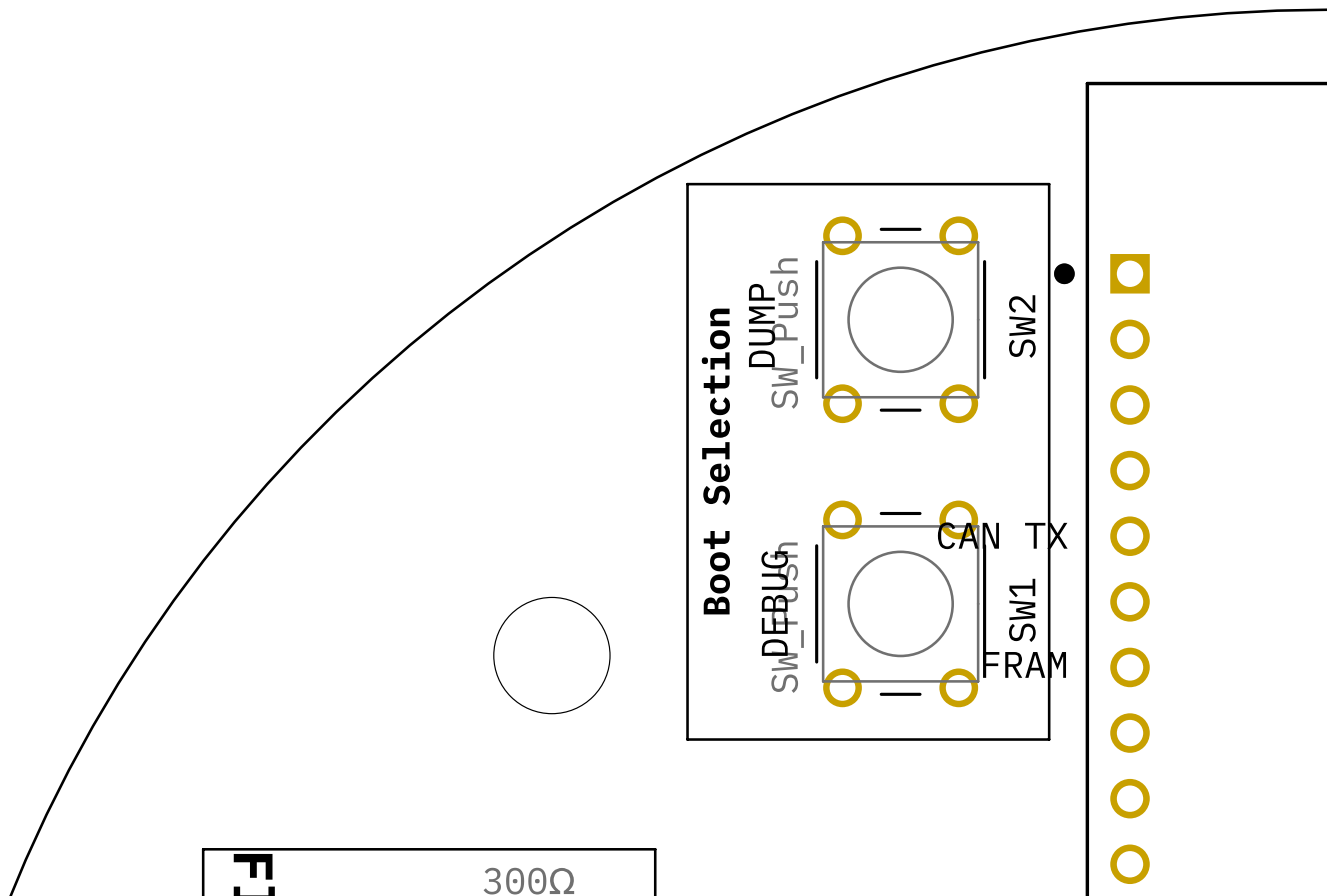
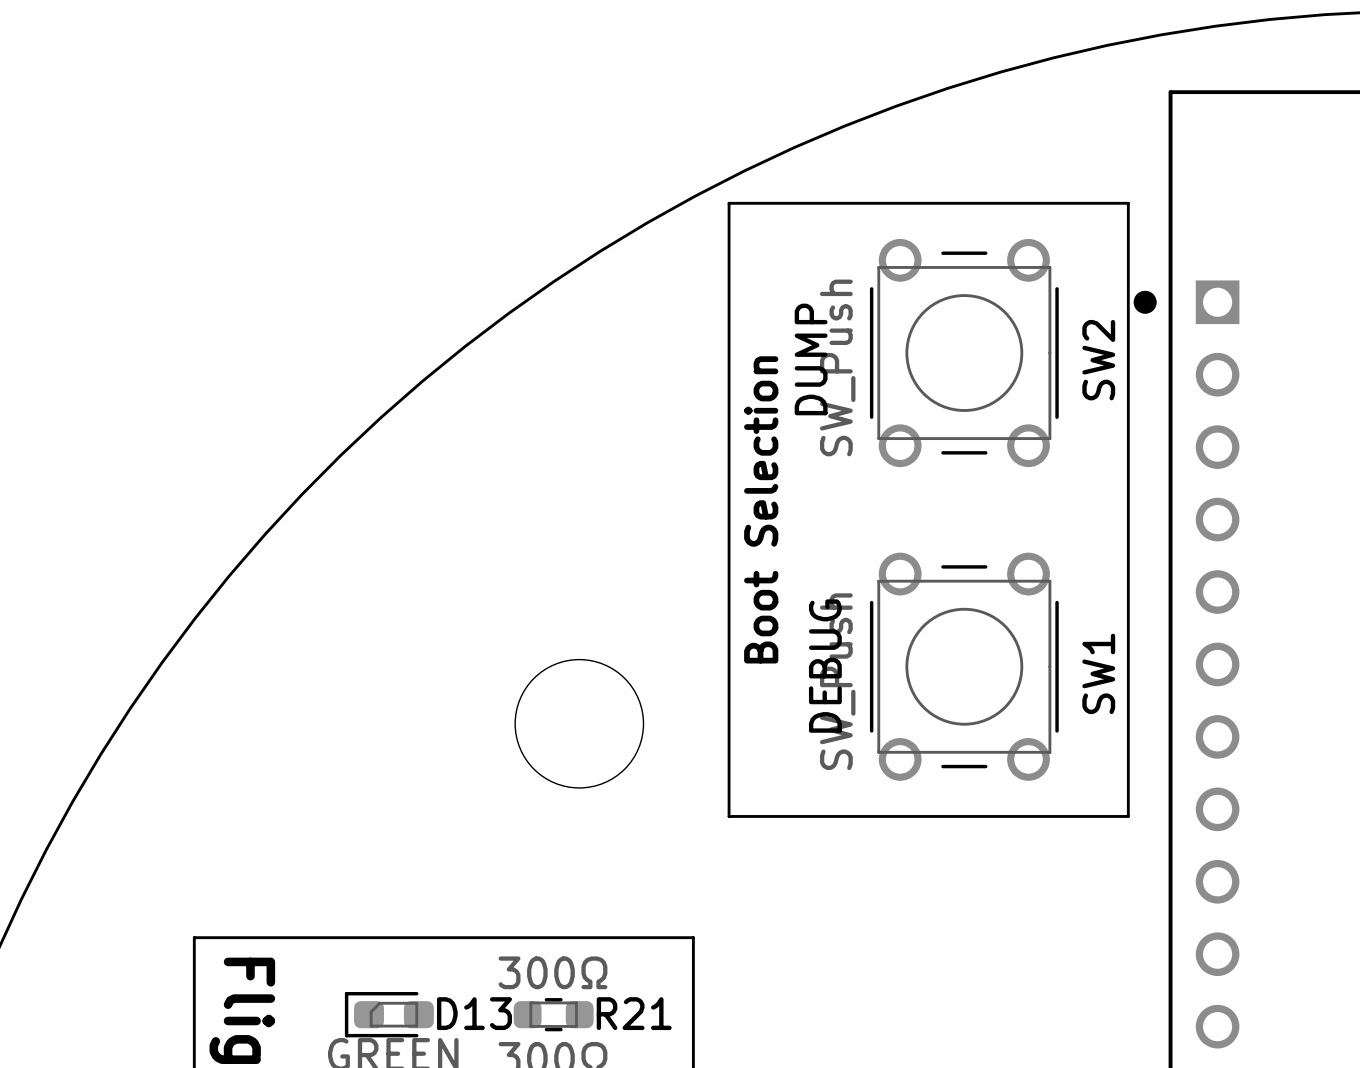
text: CAN TX (1002, 535) -> none
text: FRAM (1024, 664) -> none

